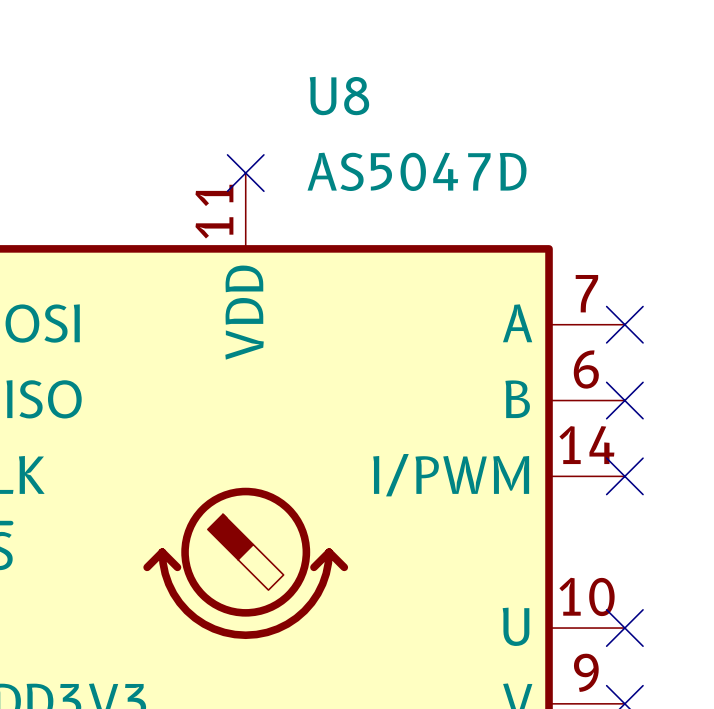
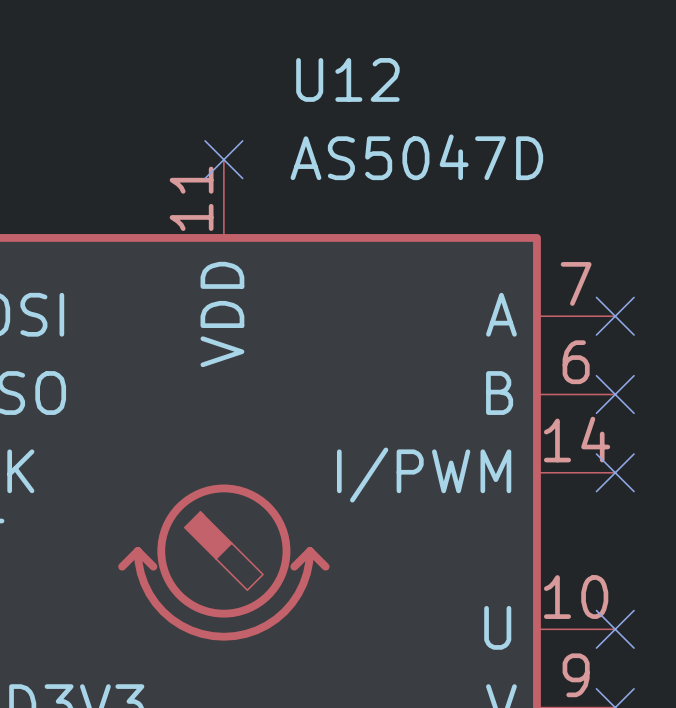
U8 name: U8 (339, 96) -> U12 (347, 79)

